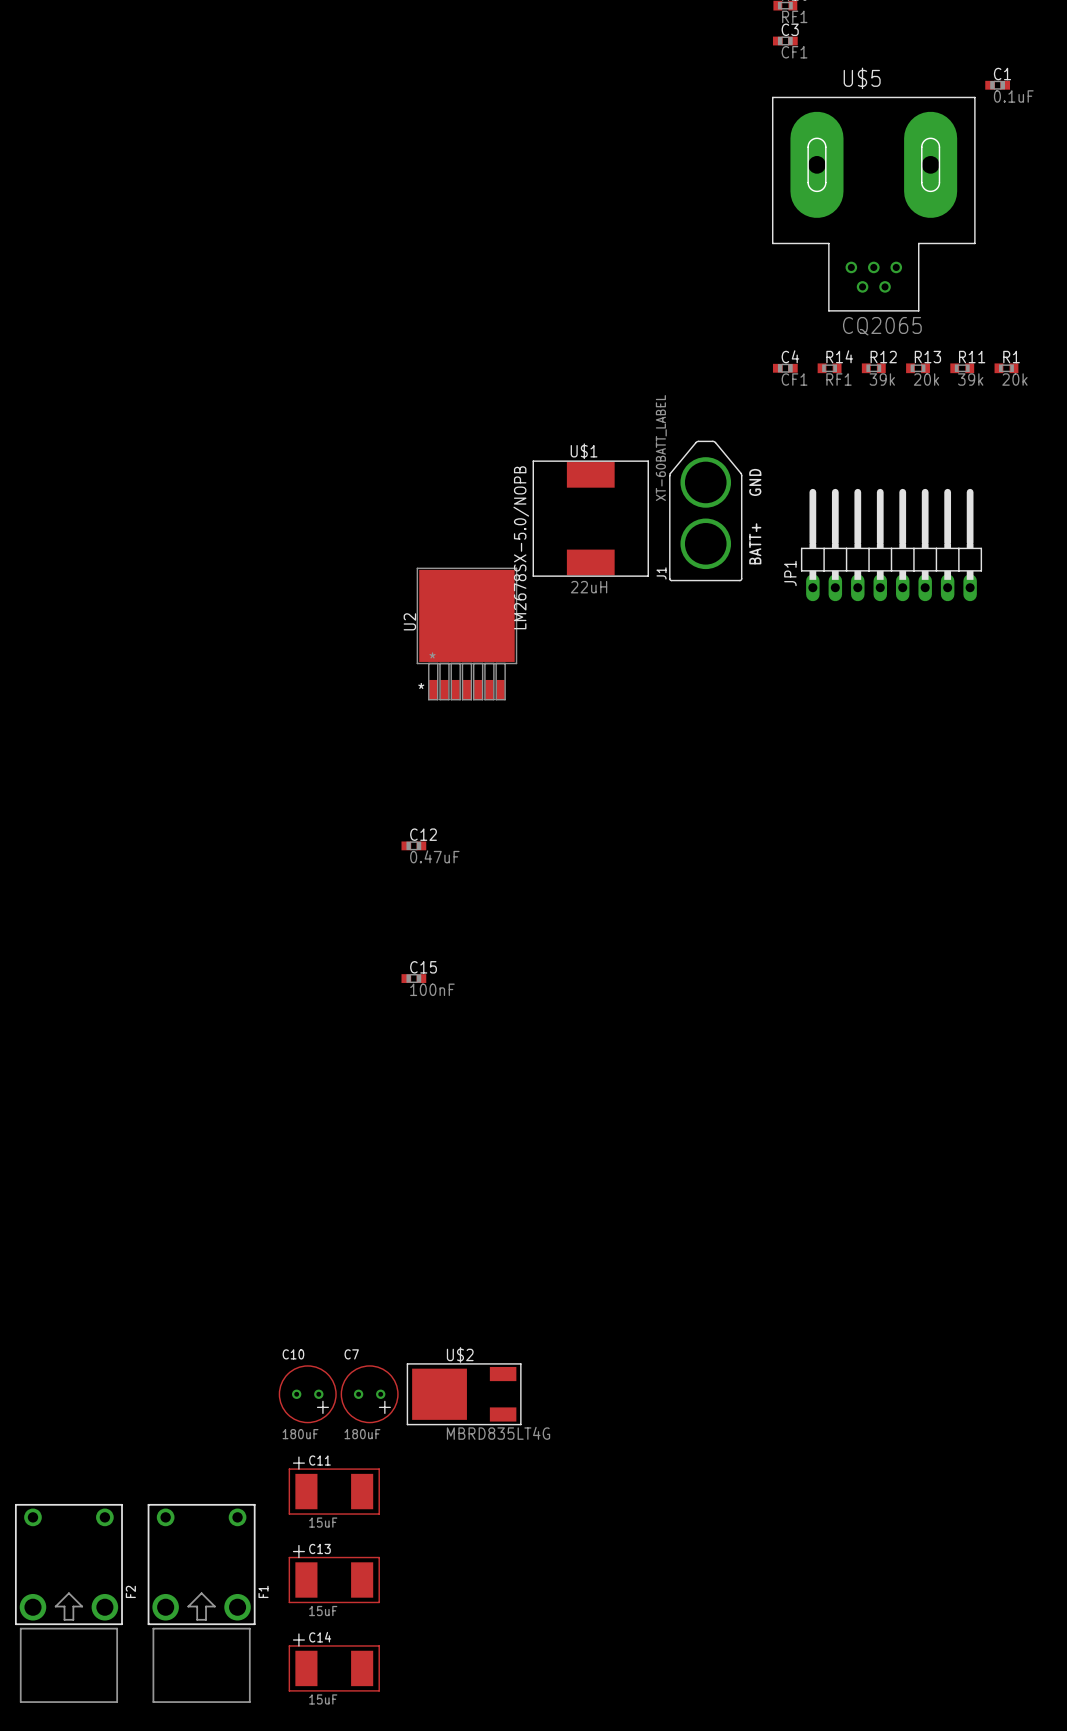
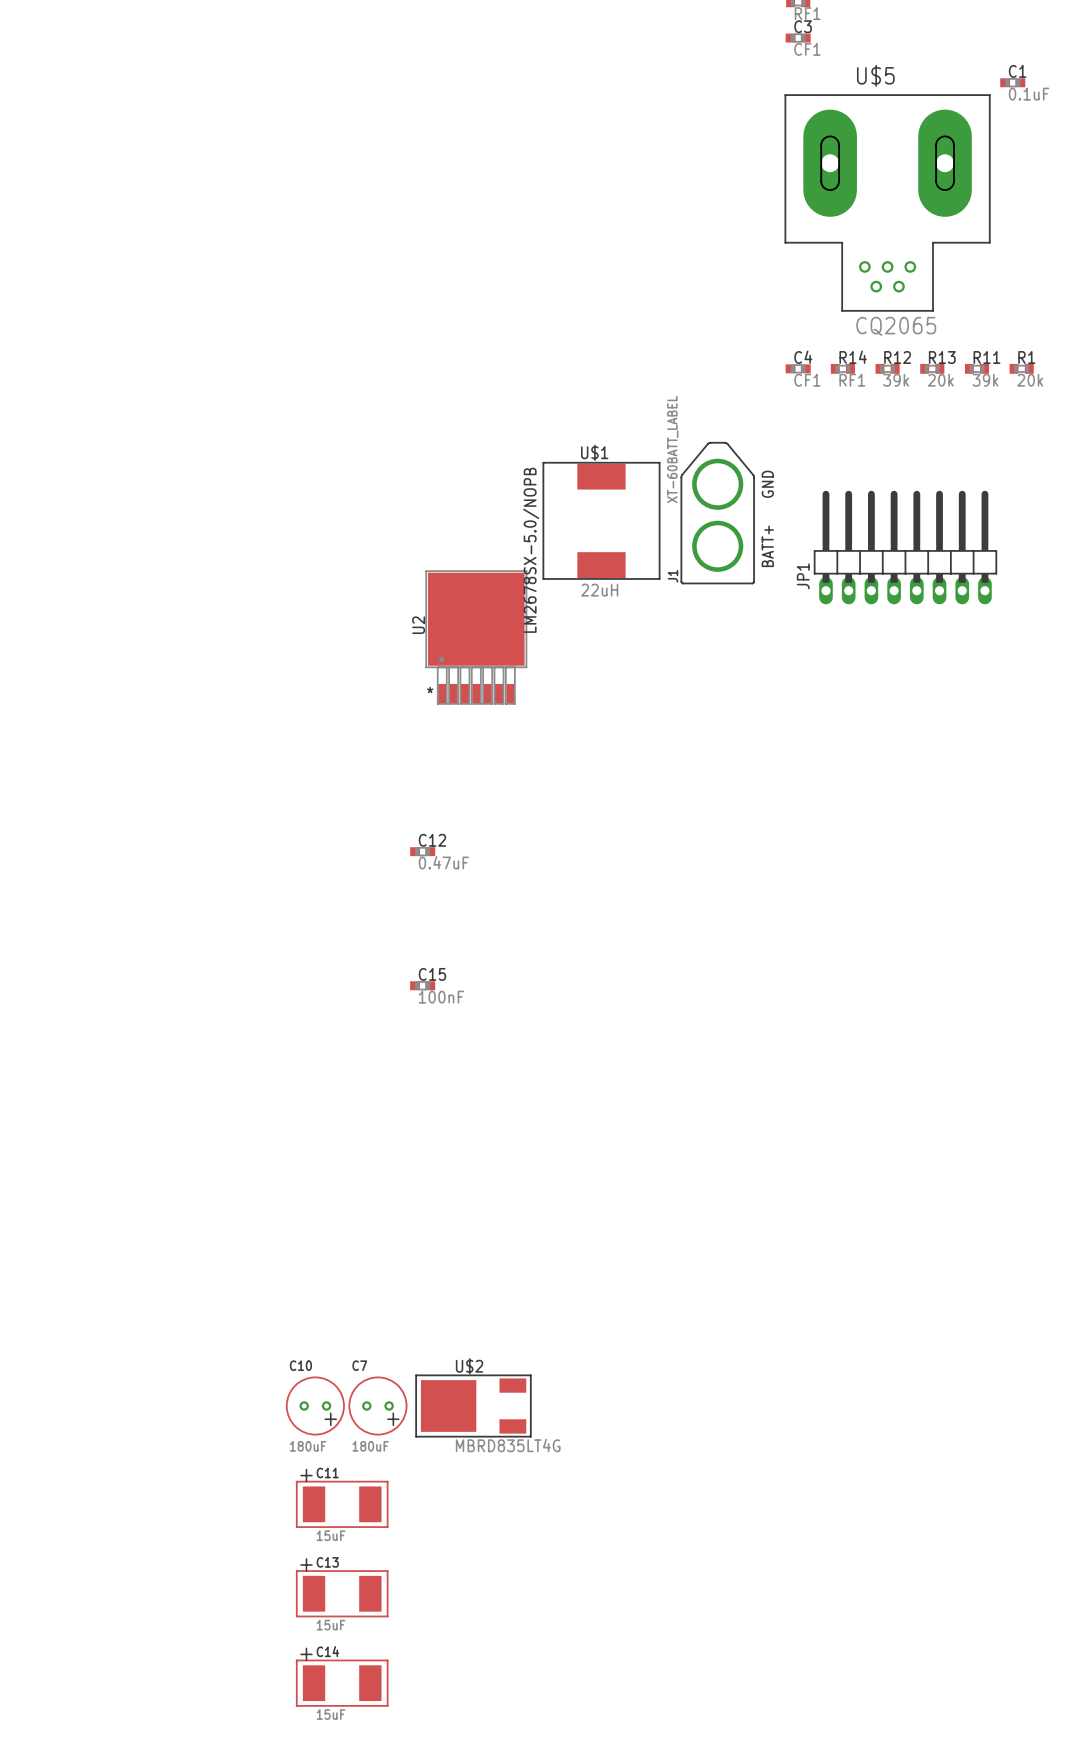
F2: (68, 1603) -> none
F1: (201, 1603) -> none

